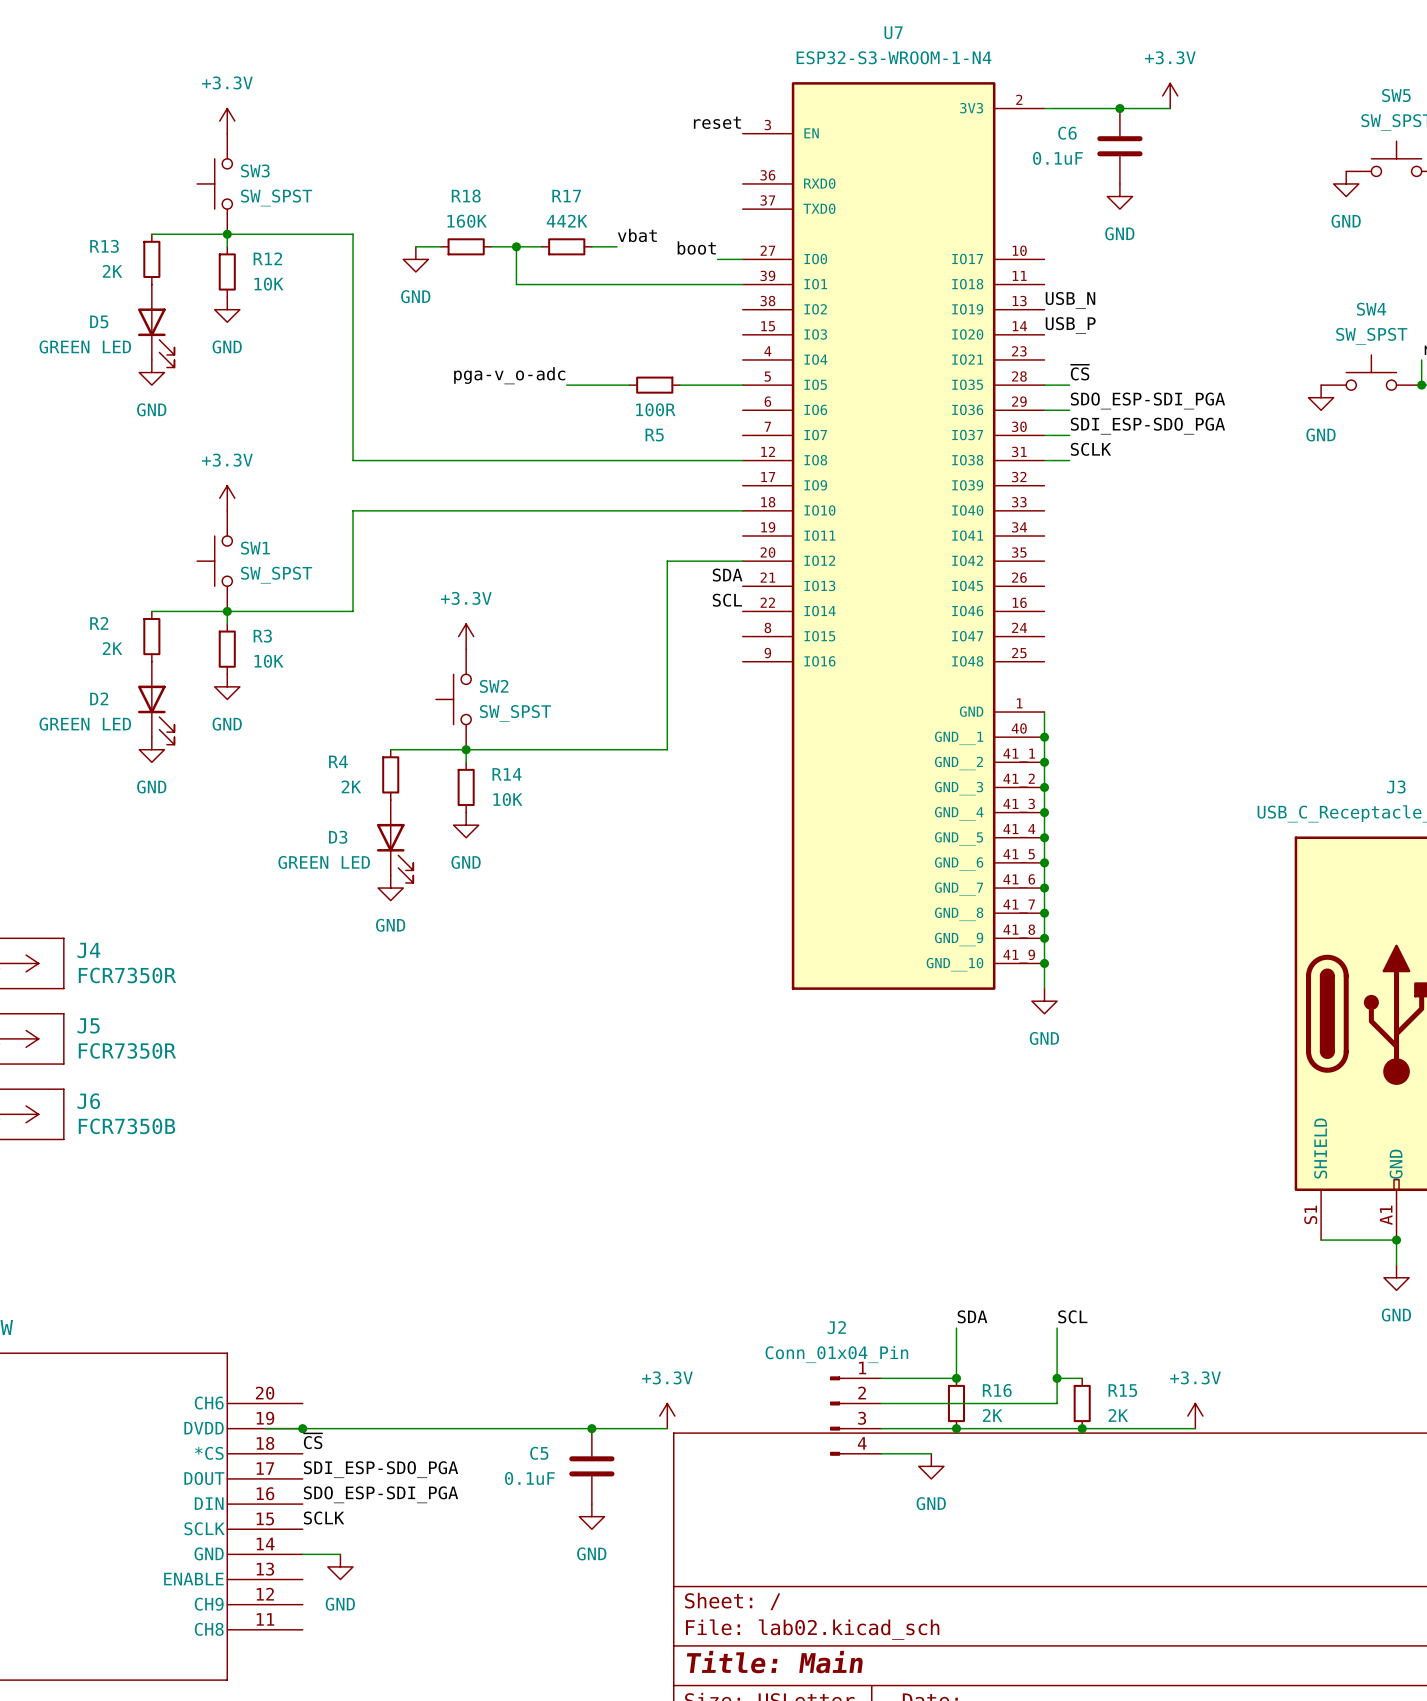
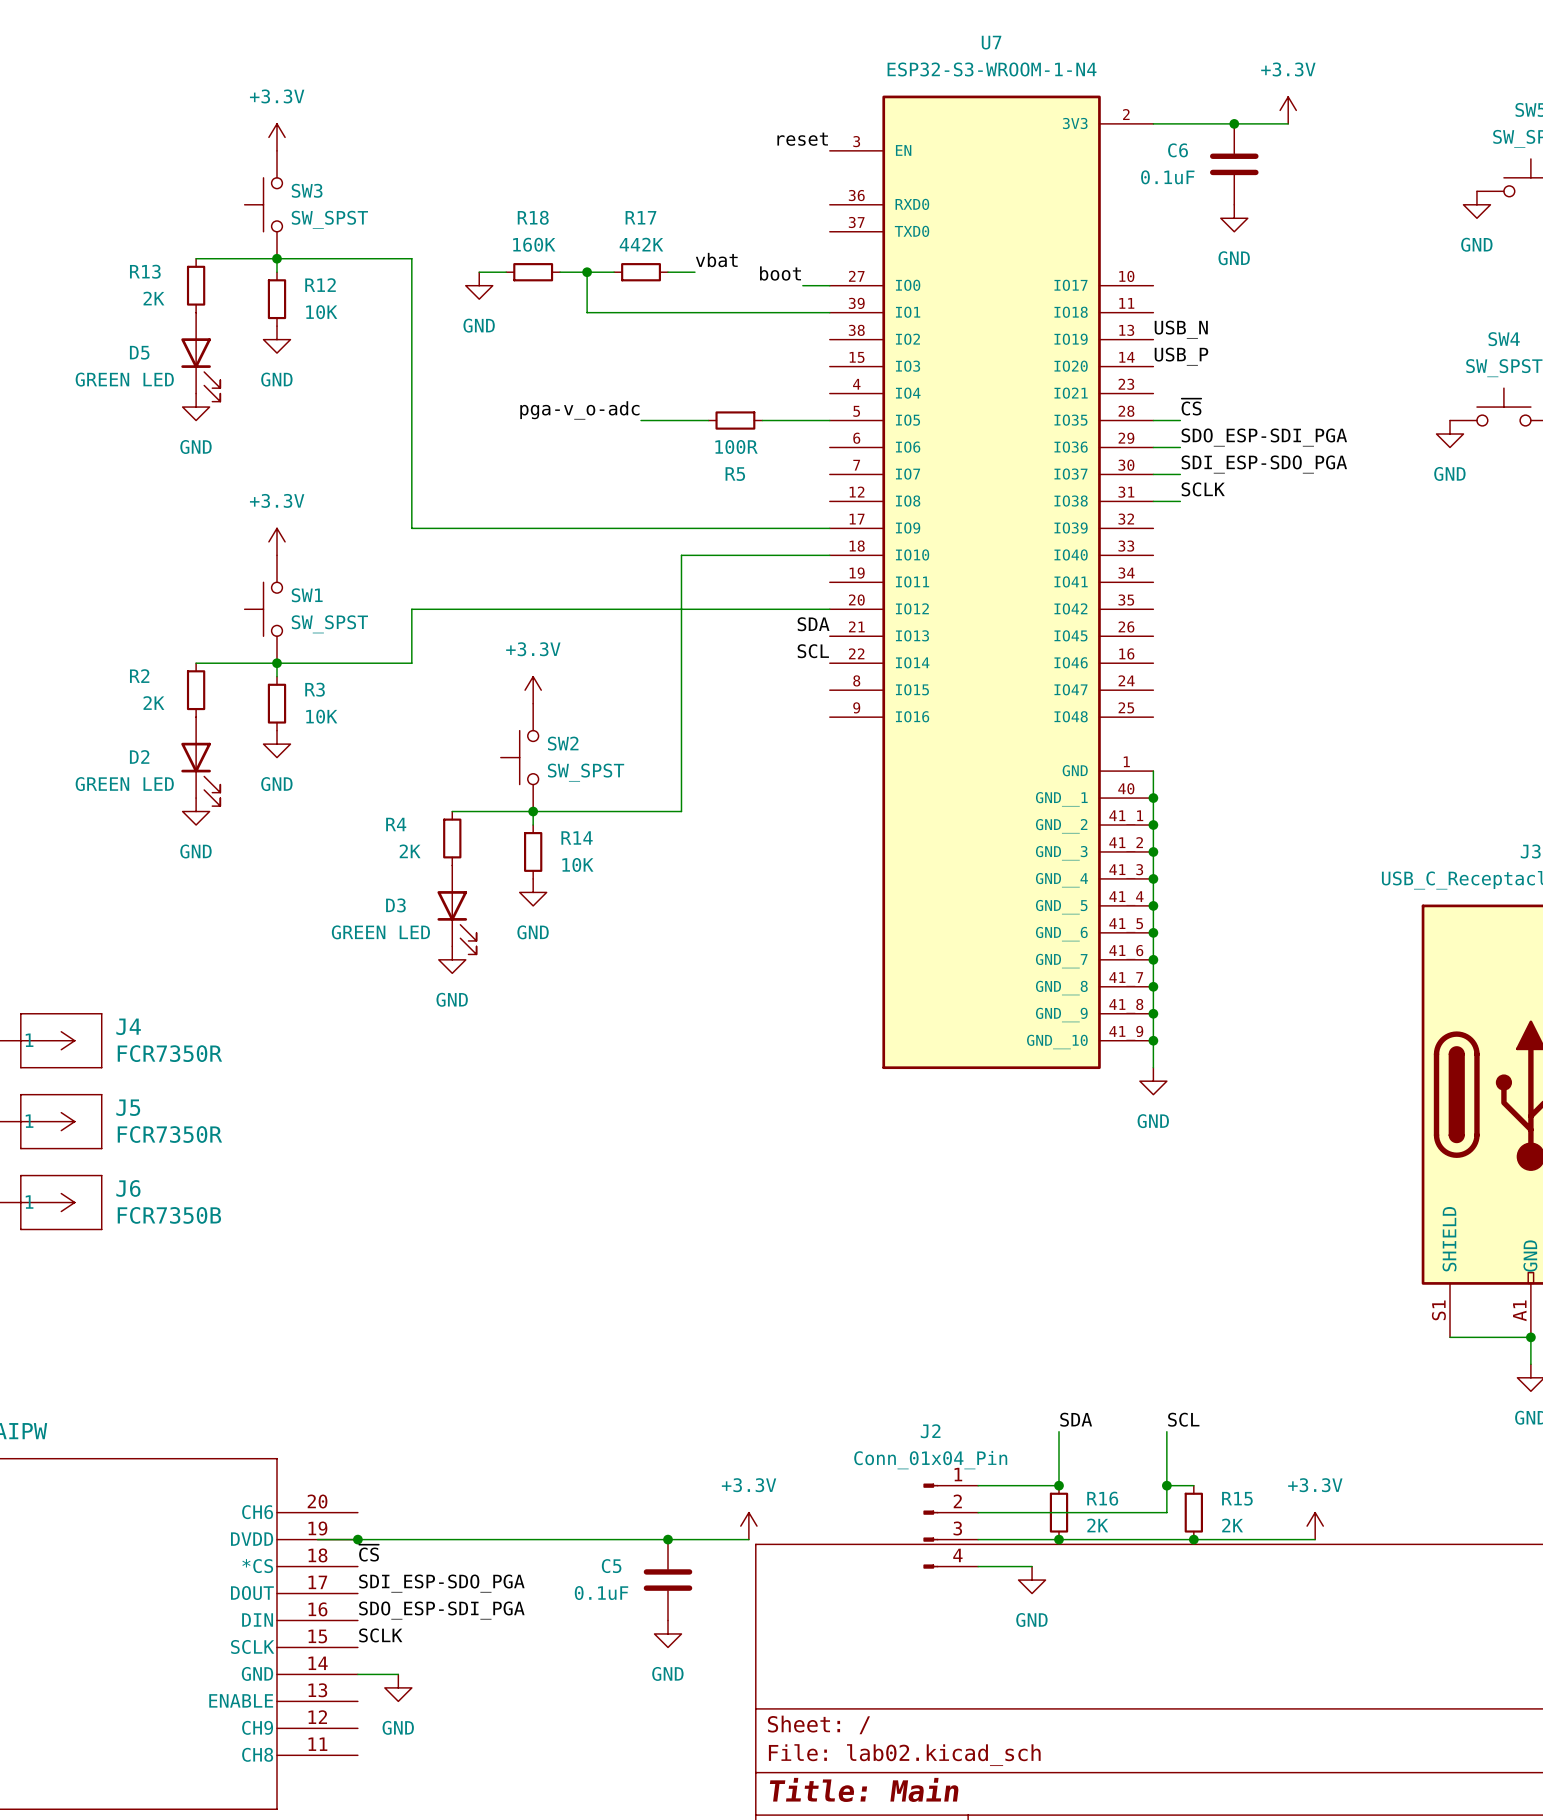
wire: (353, 460) (742, 460) -> (411, 501) (411, 528) (829, 528)
wire: (604, 510) (353, 510) (353, 561) -> (748, 609) (411, 609)
wire: (667, 561) (667, 749) (604, 749) -> (681, 555) (681, 811)

